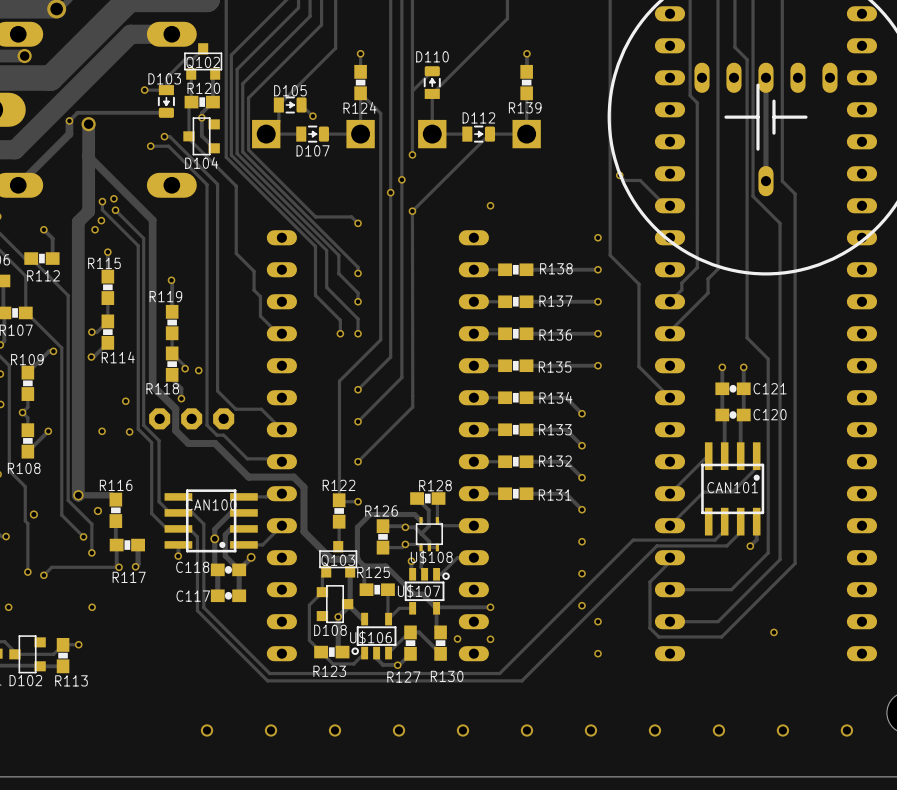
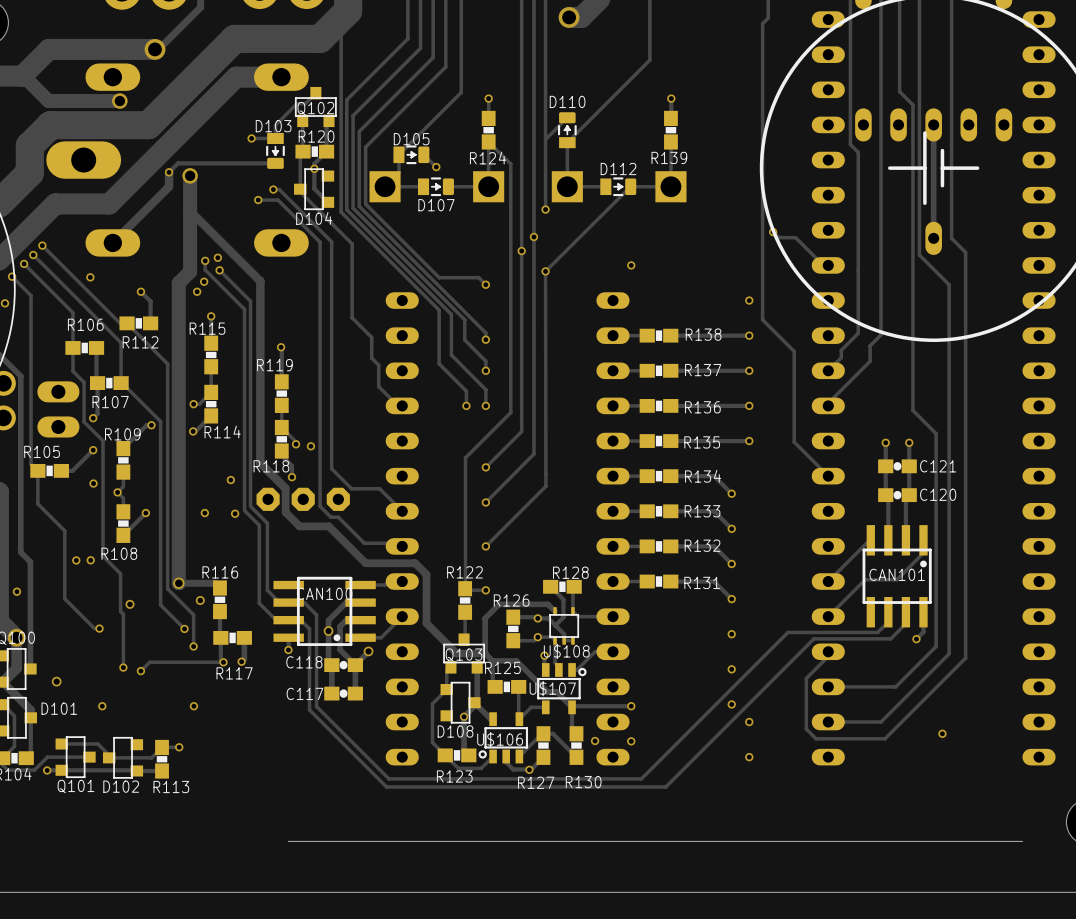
via: (207, 730) -> none
via: (271, 730) -> none
via: (335, 730) -> none
via: (399, 730) -> none
via: (462, 730) -> none
via: (526, 730) -> none
via: (590, 730) -> none
via: (654, 730) -> none
via: (718, 730) -> none
via: (782, 730) -> none
board edge: none -> (1022, 841) (288, 841)
via: (846, 730) -> none

